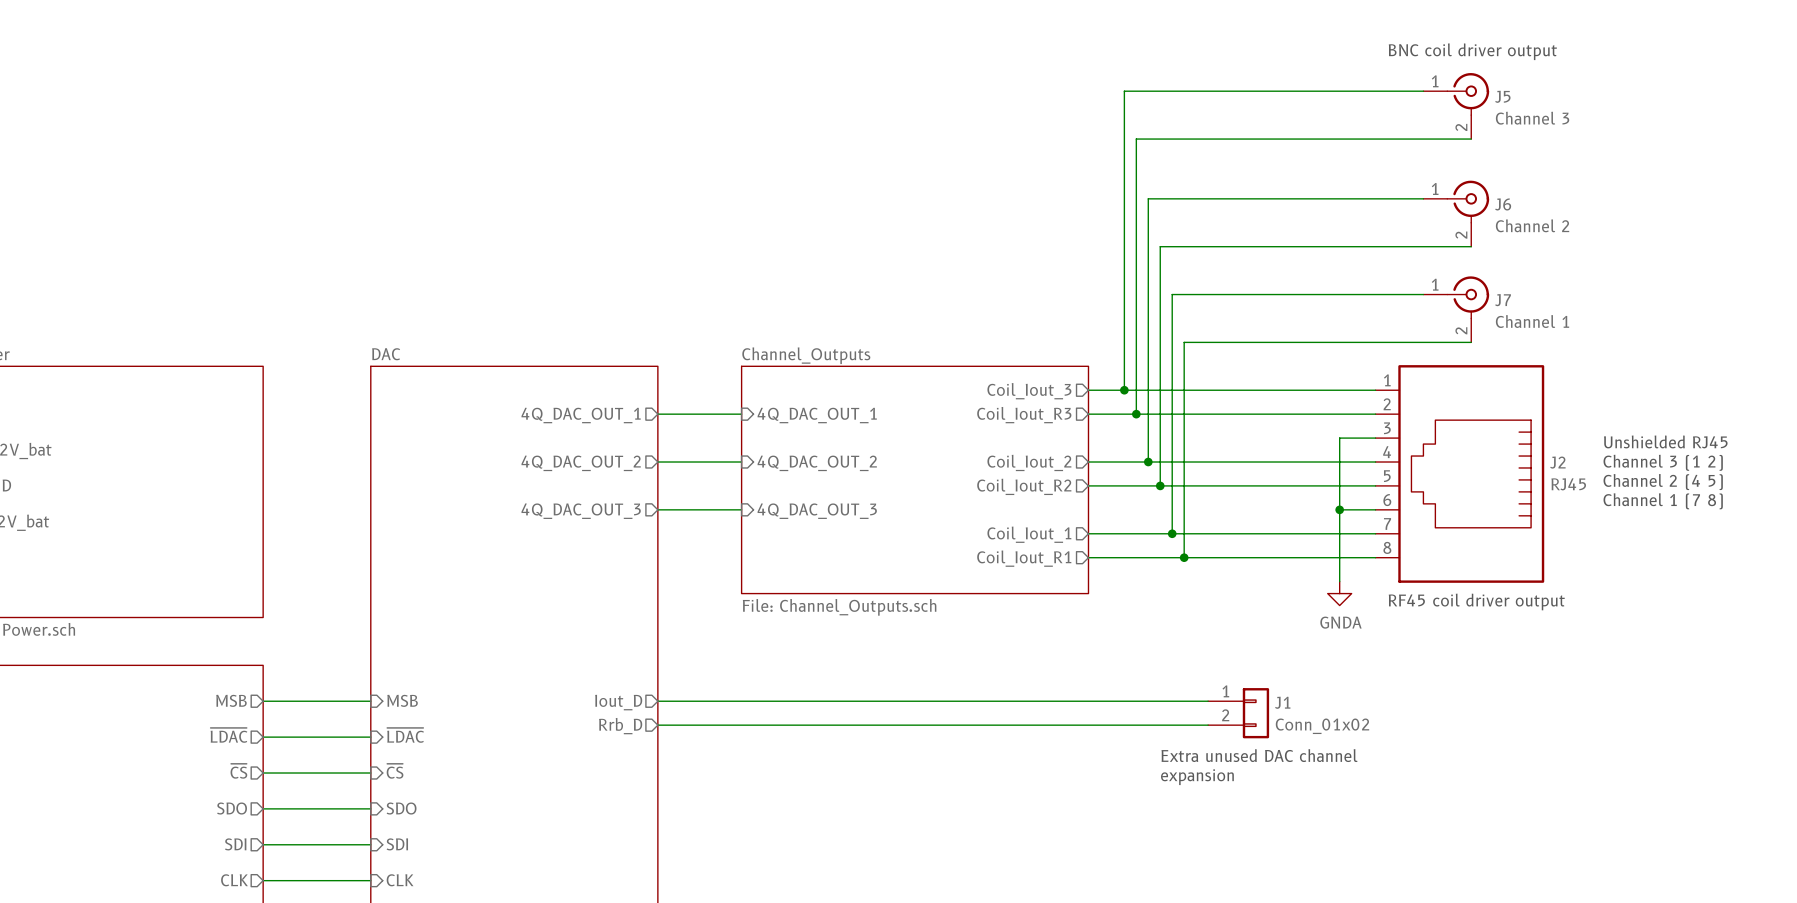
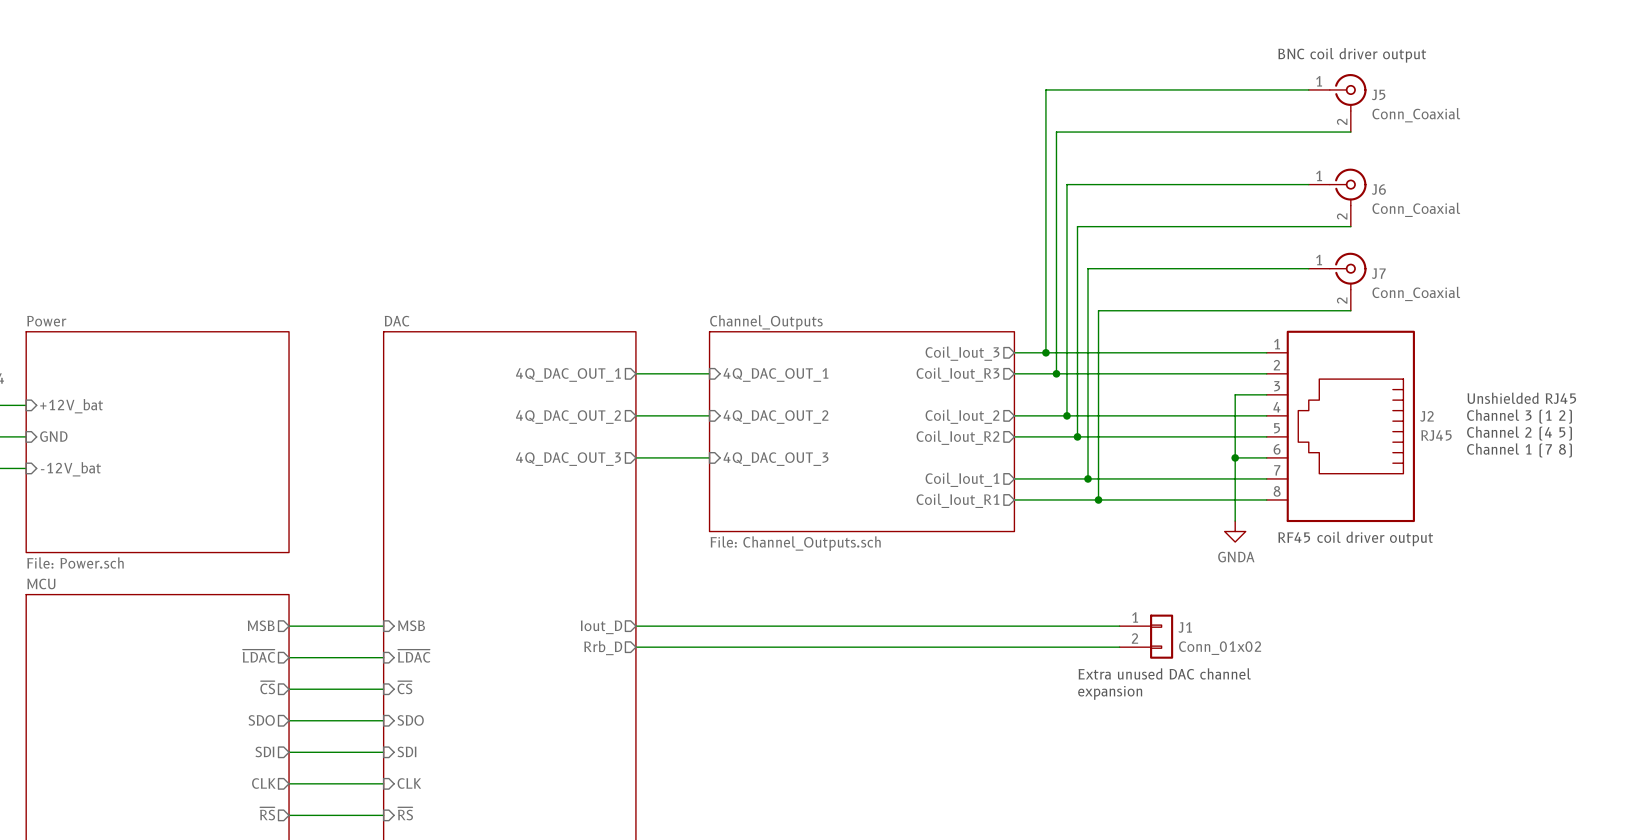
J5 value: Channel 3 (1532, 118) -> Conn_Coaxial (1416, 115)
J6 value: Channel 2 (1532, 225) -> Conn_Coaxial (1416, 209)
J7 value: Channel 1 (1532, 321) -> Conn_Coaxial (1416, 293)

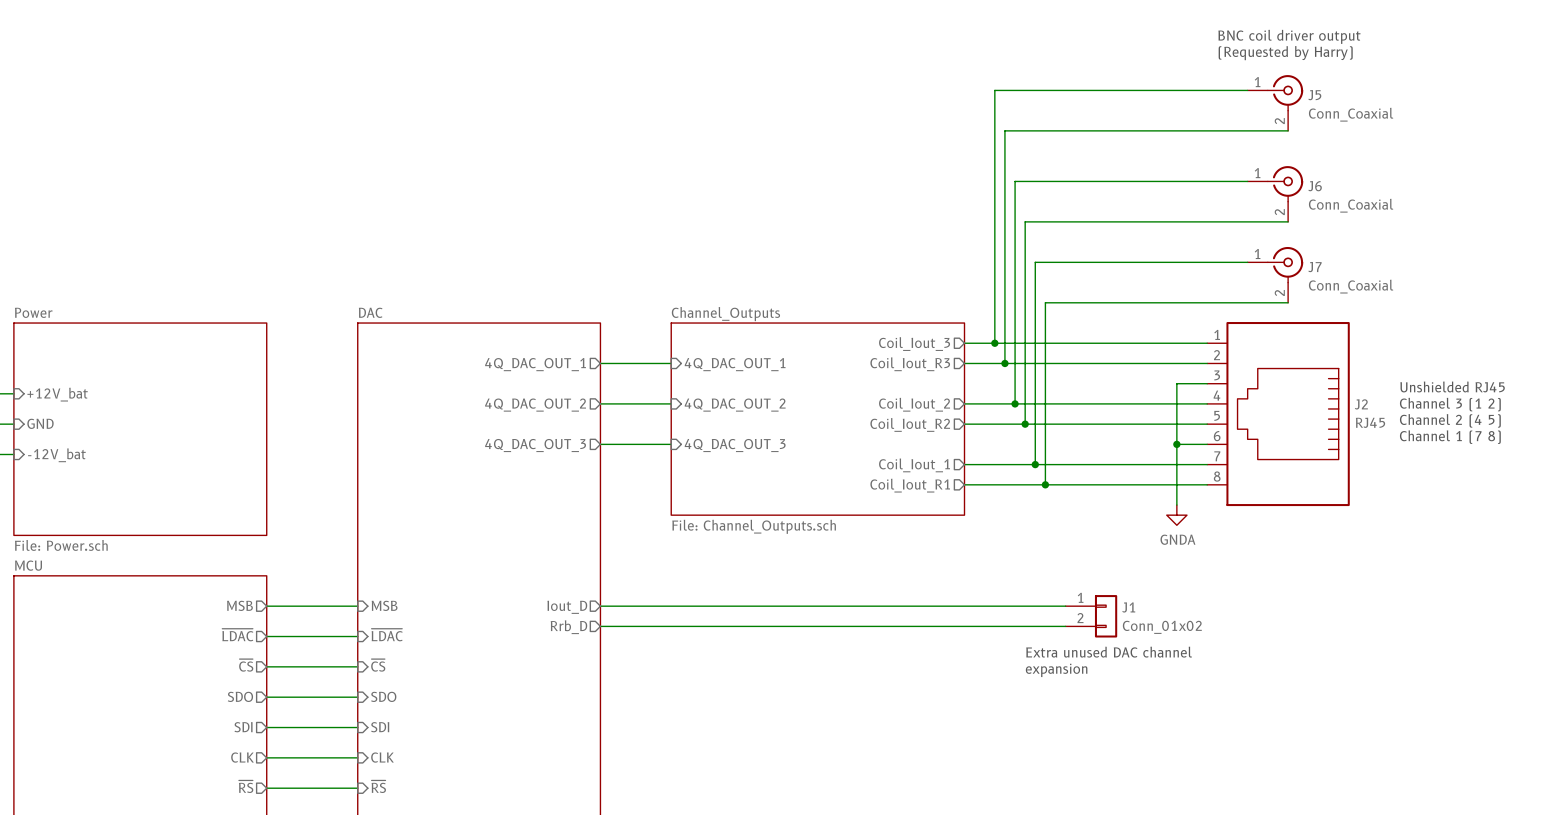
text: none -> BNC coil driver output (1289, 36)
text: BNC coil driver output (1352, 55) -> (Requested by Harry) (1285, 53)
text: RF45 coil driver output (1355, 538) -> none

